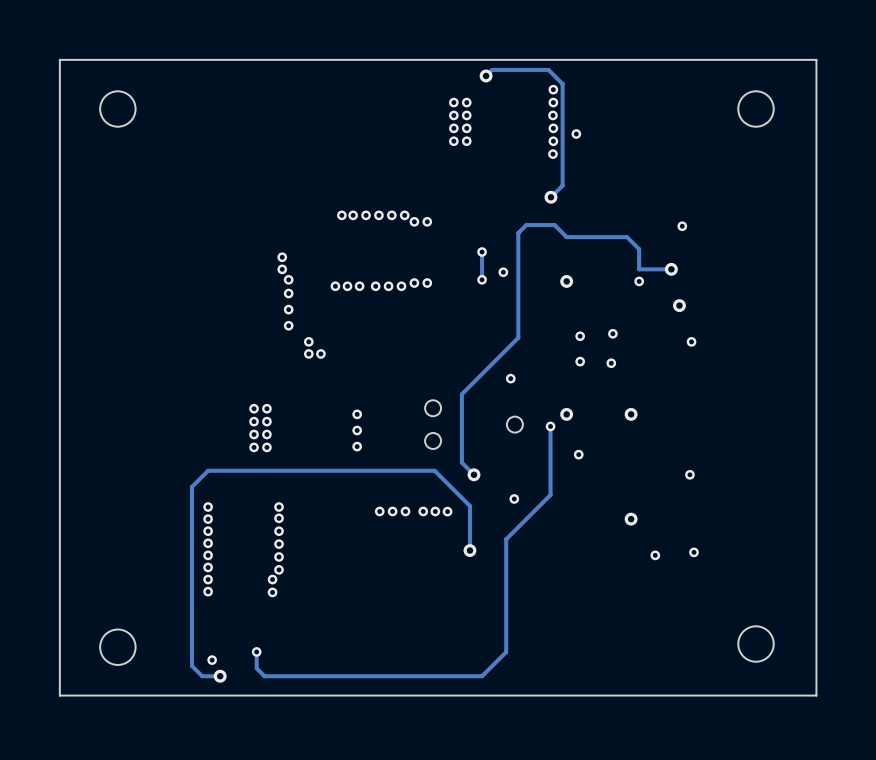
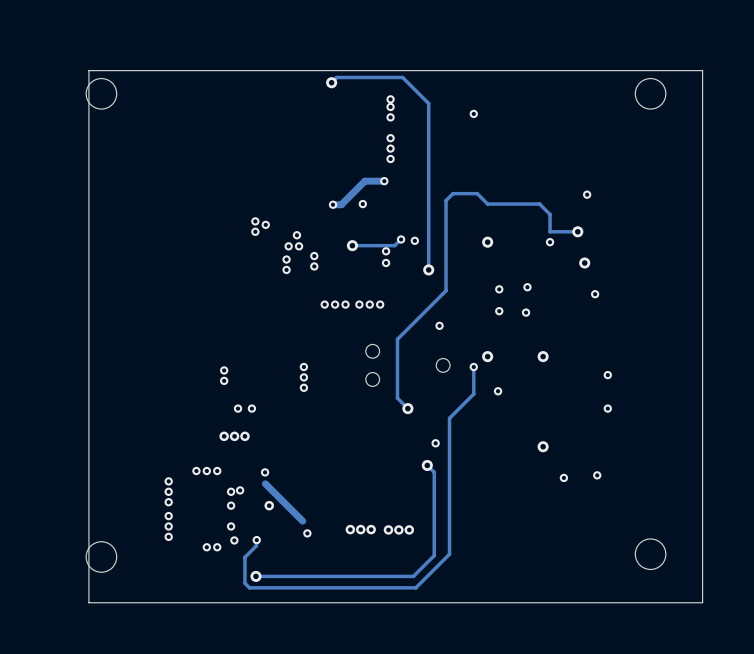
track: (486, 75) (492, 69) (548, 69) (562, 84) (562, 185) (550, 197) -> none
via: (486, 75) -> none
board edge: (816, 82) (816, 59) (59, 59) (59, 695) (816, 695) -> (702, 70) (88, 70) (88, 602) (702, 602) (702, 598)
via: (553, 89) -> none
track: none -> (331, 82) (336, 77) (402, 77) (428, 103) (428, 269)
via: none -> (331, 82)
via: (453, 102) -> none
via: (466, 102) -> none
via: (553, 102) -> none
via: (466, 115) -> none
via: (552, 115) -> none
via: none -> (390, 106)
via: (453, 128) -> none
via: (466, 128) -> none
via: (553, 128) -> none
via: none -> (473, 113)
via: (576, 133) -> none
via: none -> (390, 117)
via: (453, 141) -> none
via: (466, 141) -> none
via: (553, 141) -> none
via: (552, 154) -> none
via: none -> (390, 138)
via: none -> (390, 148)
via: none -> (390, 158)
via: (550, 197) -> none
track: none -> (384, 181) (364, 181) (341, 204) (333, 204)
via: none -> (384, 181)
via: (341, 215) -> none
via: (353, 215) -> none
via: (366, 215) -> none
via: (378, 215) -> none
via: (391, 215) -> none
via: (404, 215) -> none
via: (414, 221) -> none
via: (427, 221) -> none
via: none -> (333, 204)
via: none -> (362, 204)
track: (482, 252) (482, 279) -> none
via: (482, 252) -> none
via: (282, 257) -> none
via: none -> (255, 221)
via: none -> (265, 224)
via: (282, 269) -> none
via: none -> (255, 231)
via: (503, 272) -> none
via: none -> (296, 235)
track: none -> (400, 239) (394, 245) (352, 245)
via: none -> (401, 239)
via: (288, 279) -> none
via: (414, 283) -> none
via: (427, 283) -> none
via: none -> (352, 245)
via: (359, 286) -> none
via: (375, 286) -> none
via: (388, 286) -> none
via: (401, 286) -> none
via: none -> (386, 251)
via: (288, 293) -> none
via: none -> (314, 256)
via: none -> (286, 259)
via: none -> (386, 262)
via: (288, 309) -> none
via: none -> (314, 266)
via: none -> (286, 269)
via: none -> (428, 269)
via: (288, 325) -> none
via: (308, 341) -> none
via: (308, 353) -> none
via: (320, 353) -> none
via: none -> (324, 304)
via: none -> (335, 304)
via: none -> (345, 304)
via: none -> (359, 304)
via: none -> (369, 304)
via: none -> (380, 304)
via: (254, 408) -> none
via: (266, 408) -> none
via: (357, 414) -> none
via: (254, 421) -> none
via: (266, 421) -> none
via: none -> (303, 366)
via: none -> (224, 370)
via: (357, 430) -> none
via: (254, 434) -> none
via: (266, 434) -> none
via: none -> (607, 375)
via: none -> (303, 377)
via: none -> (224, 380)
via: (357, 446) -> none
via: (254, 447) -> none
via: (266, 447) -> none
via: none -> (303, 387)
track: (550, 457) (550, 494) (506, 539) (506, 652) (482, 676) (264, 676) (256, 668) (256, 651) -> (473, 394) (449, 418) (449, 554) (415, 587) (249, 587) (244, 583) (244, 557) (256, 545) (256, 540)
via: none -> (238, 408)
via: none -> (251, 408)
via position: (689, 474) -> (607, 408)
via position: (514, 498) -> (435, 443)
via: (208, 507) -> none
via: none -> (224, 436)
via: none -> (234, 436)
via: (279, 507) -> none
via: none -> (244, 436)
via: (379, 511) -> none
via: (392, 511) -> none
via: (405, 511) -> none
via: (423, 511) -> none
via: (435, 511) -> none
via: (447, 511) -> none
via: (279, 518) -> none
via: (208, 519) -> none
via: (208, 531) -> none
via: (279, 531) -> none
track: none -> (427, 465) (434, 472) (434, 555) (413, 576) (255, 576)
via: (208, 543) -> none
via: (279, 544) -> none
via: none -> (196, 471)
via: none -> (206, 471)
via: none -> (217, 471)
via: none -> (265, 472)
track: (469, 550) (469, 506) (434, 470) (208, 470) (191, 486) (191, 665) (202, 676) (220, 676) -> none
via position: (469, 550) -> (427, 465)
via: (208, 555) -> none
via: (279, 556) -> none
via: none -> (168, 481)
track: none -> (265, 483) (302, 521)
via: (208, 567) -> none
via: none -> (168, 491)
via: none -> (231, 491)
via: (208, 579) -> none
via: (272, 579) -> none
via: none -> (168, 502)
via: none -> (231, 505)
via: none -> (269, 505)
via: (208, 591) -> none
via: (272, 592) -> none
via: none -> (168, 516)
via: none -> (168, 526)
via: none -> (231, 526)
via: none -> (350, 529)
via: none -> (360, 529)
via: none -> (371, 529)
via: none -> (388, 529)
via: none -> (398, 529)
via: none -> (409, 529)
via: none -> (307, 533)
via: none -> (168, 536)
via: none -> (256, 540)
via: none -> (234, 540)
via: none -> (206, 547)
via: none -> (217, 547)
via: (256, 651) -> none
via: (212, 660) -> none
via position: (220, 676) -> (255, 576)

